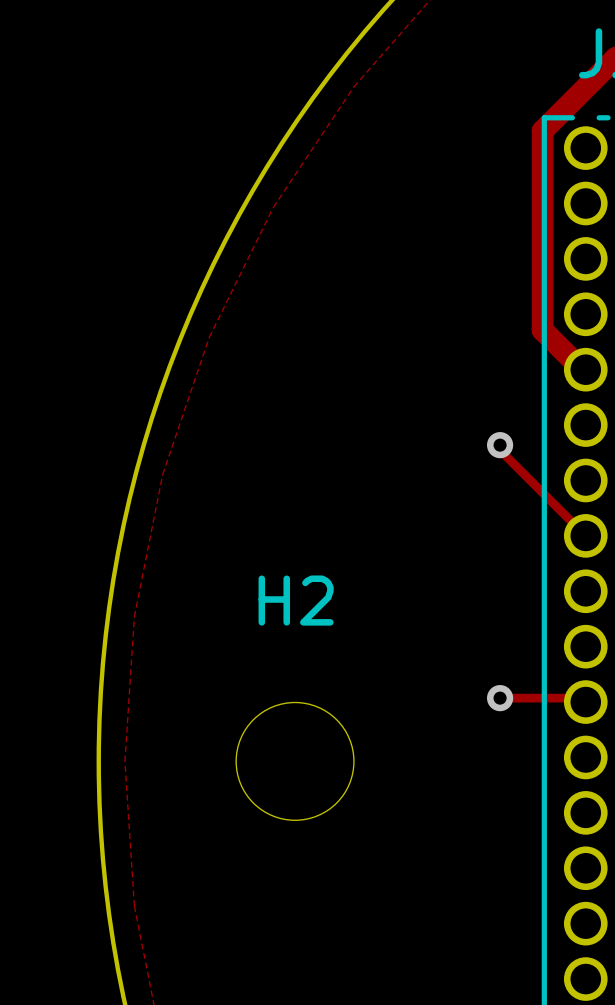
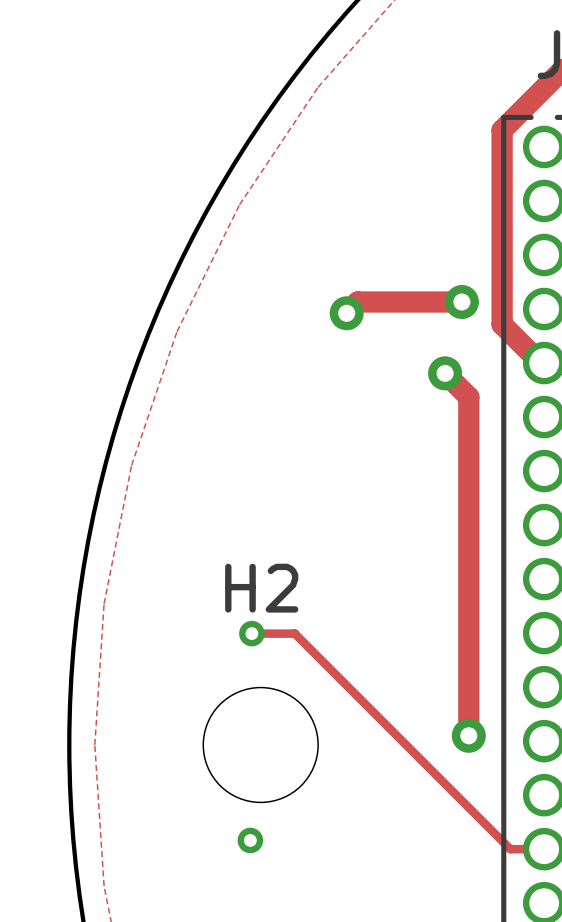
track: none -> (461, 302) (357, 302) (346, 313)
via: none -> (461, 302)
via: none -> (346, 313)
track: none -> (445, 373) (468, 397) (468, 735)
via: none -> (445, 373)
track: (500, 445) (500, 450) (585, 535) -> none
via: (500, 445) -> none
track: none -> (251, 633) (294, 633) (510, 849) (544, 849)
via: none -> (251, 633)
track: (500, 698) (581, 698) (585, 702) -> none
via: (500, 698) -> none
via: none -> (468, 735)
via: none -> (250, 840)

